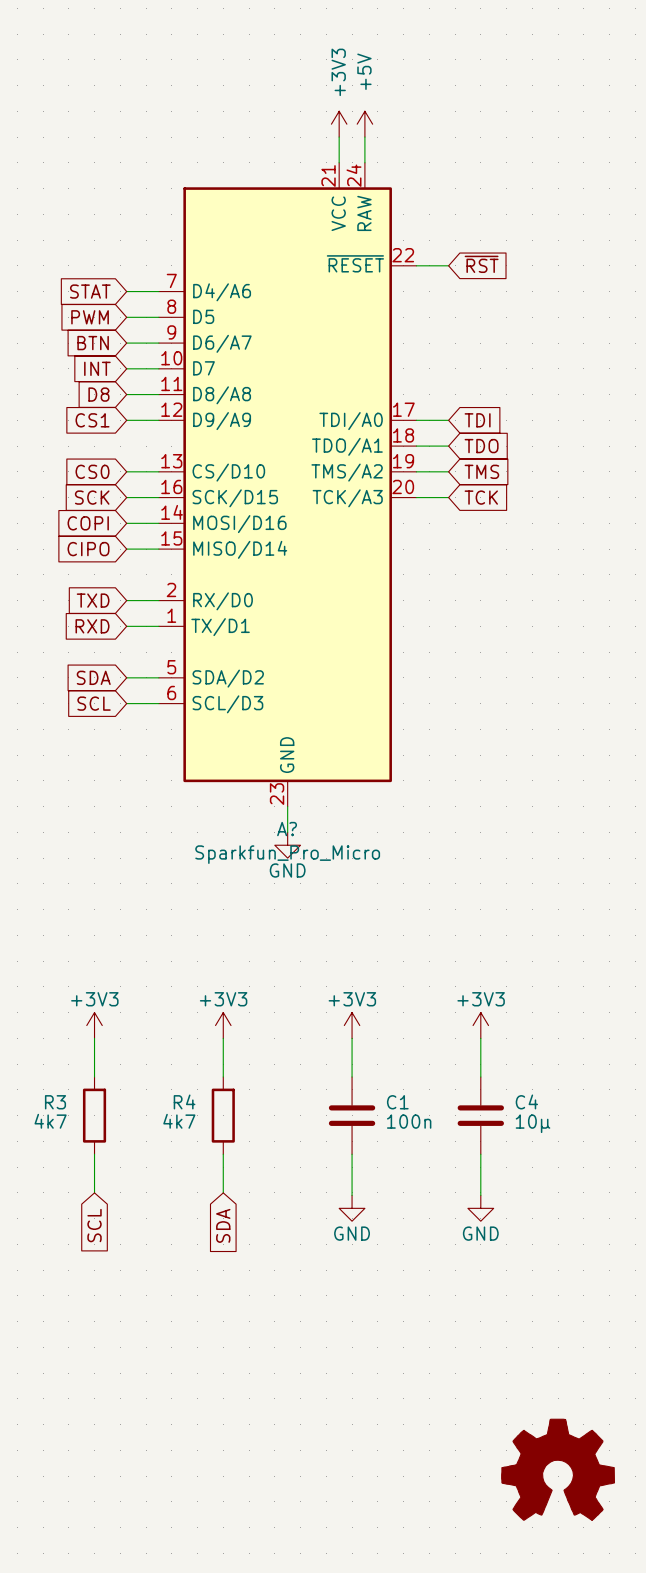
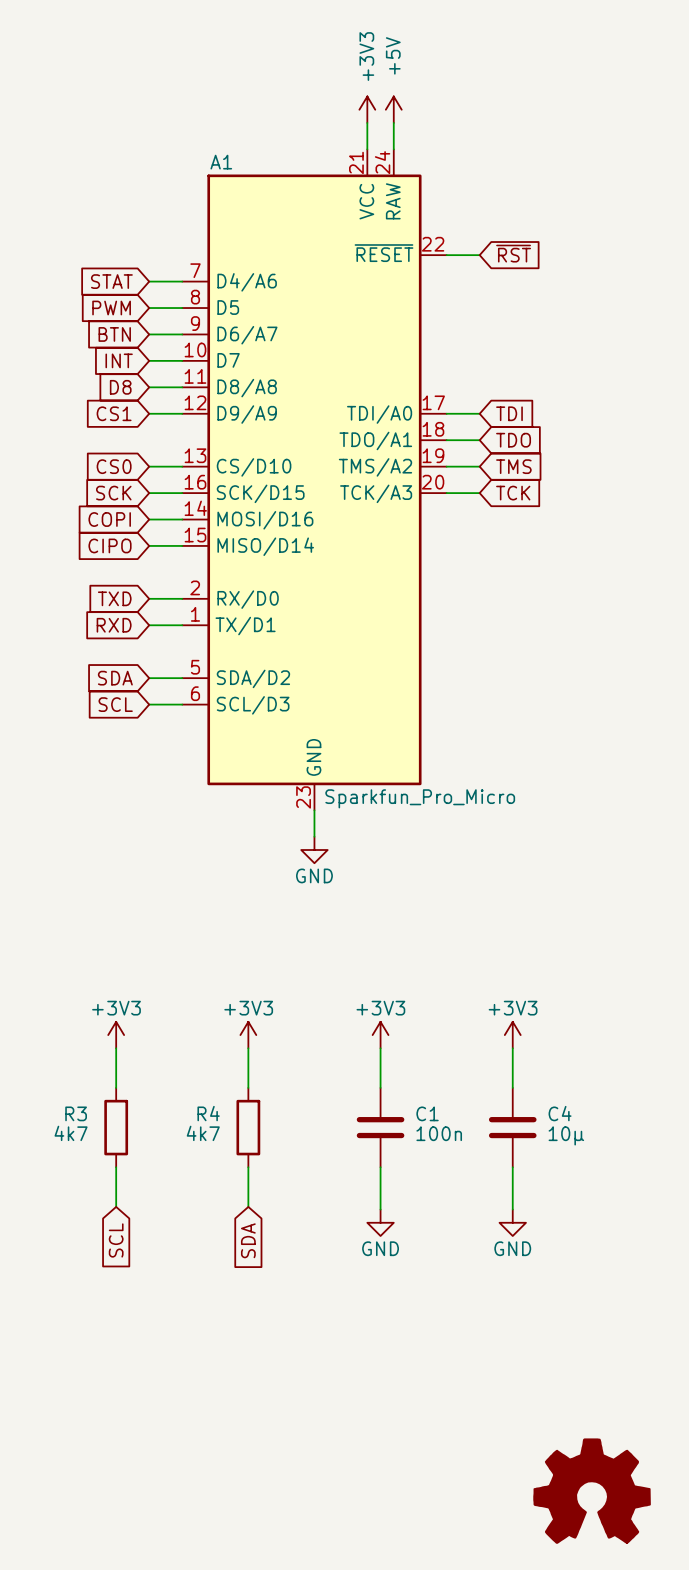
A? name: A? (287, 829) -> A1 (221, 162)
A? value position: Sparkfun_Pro_Micro (287, 854) -> Sparkfun_Pro_Micro (420, 798)

